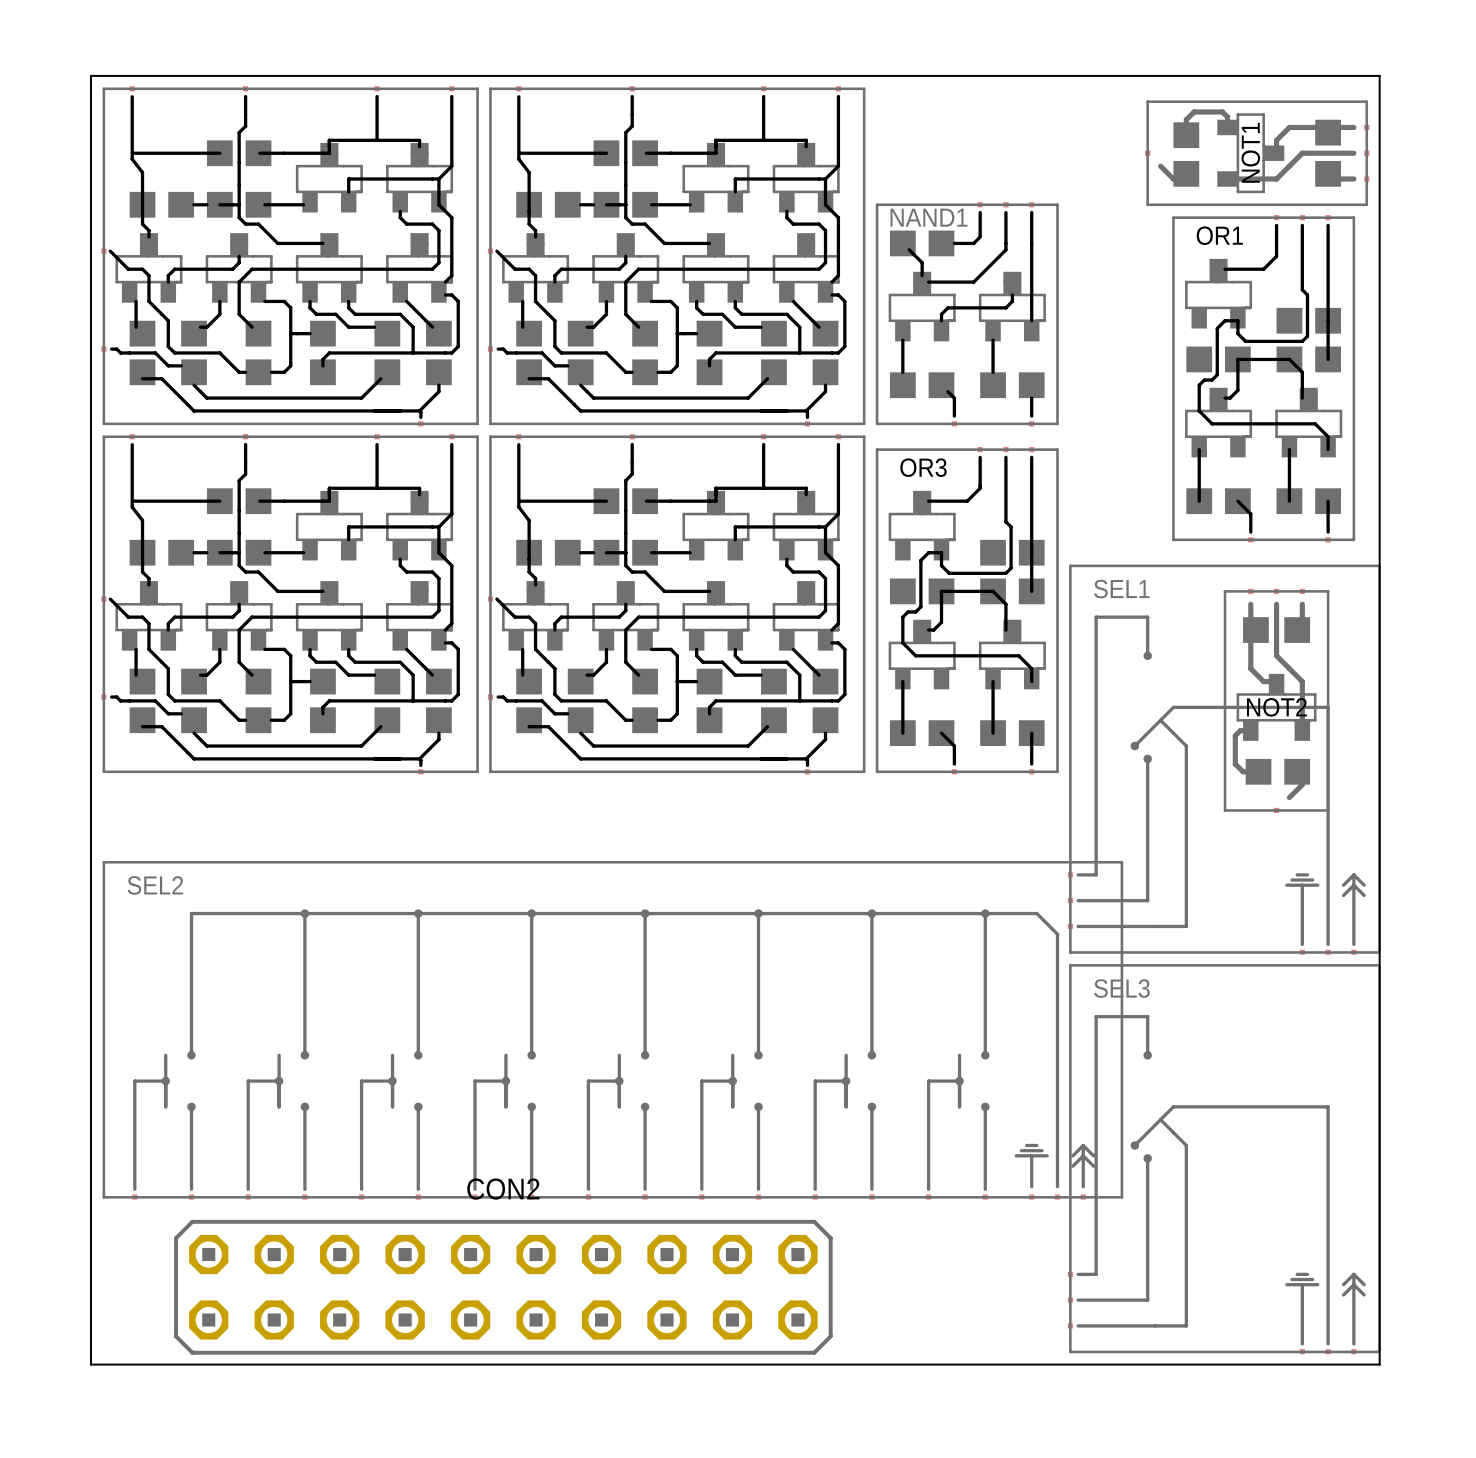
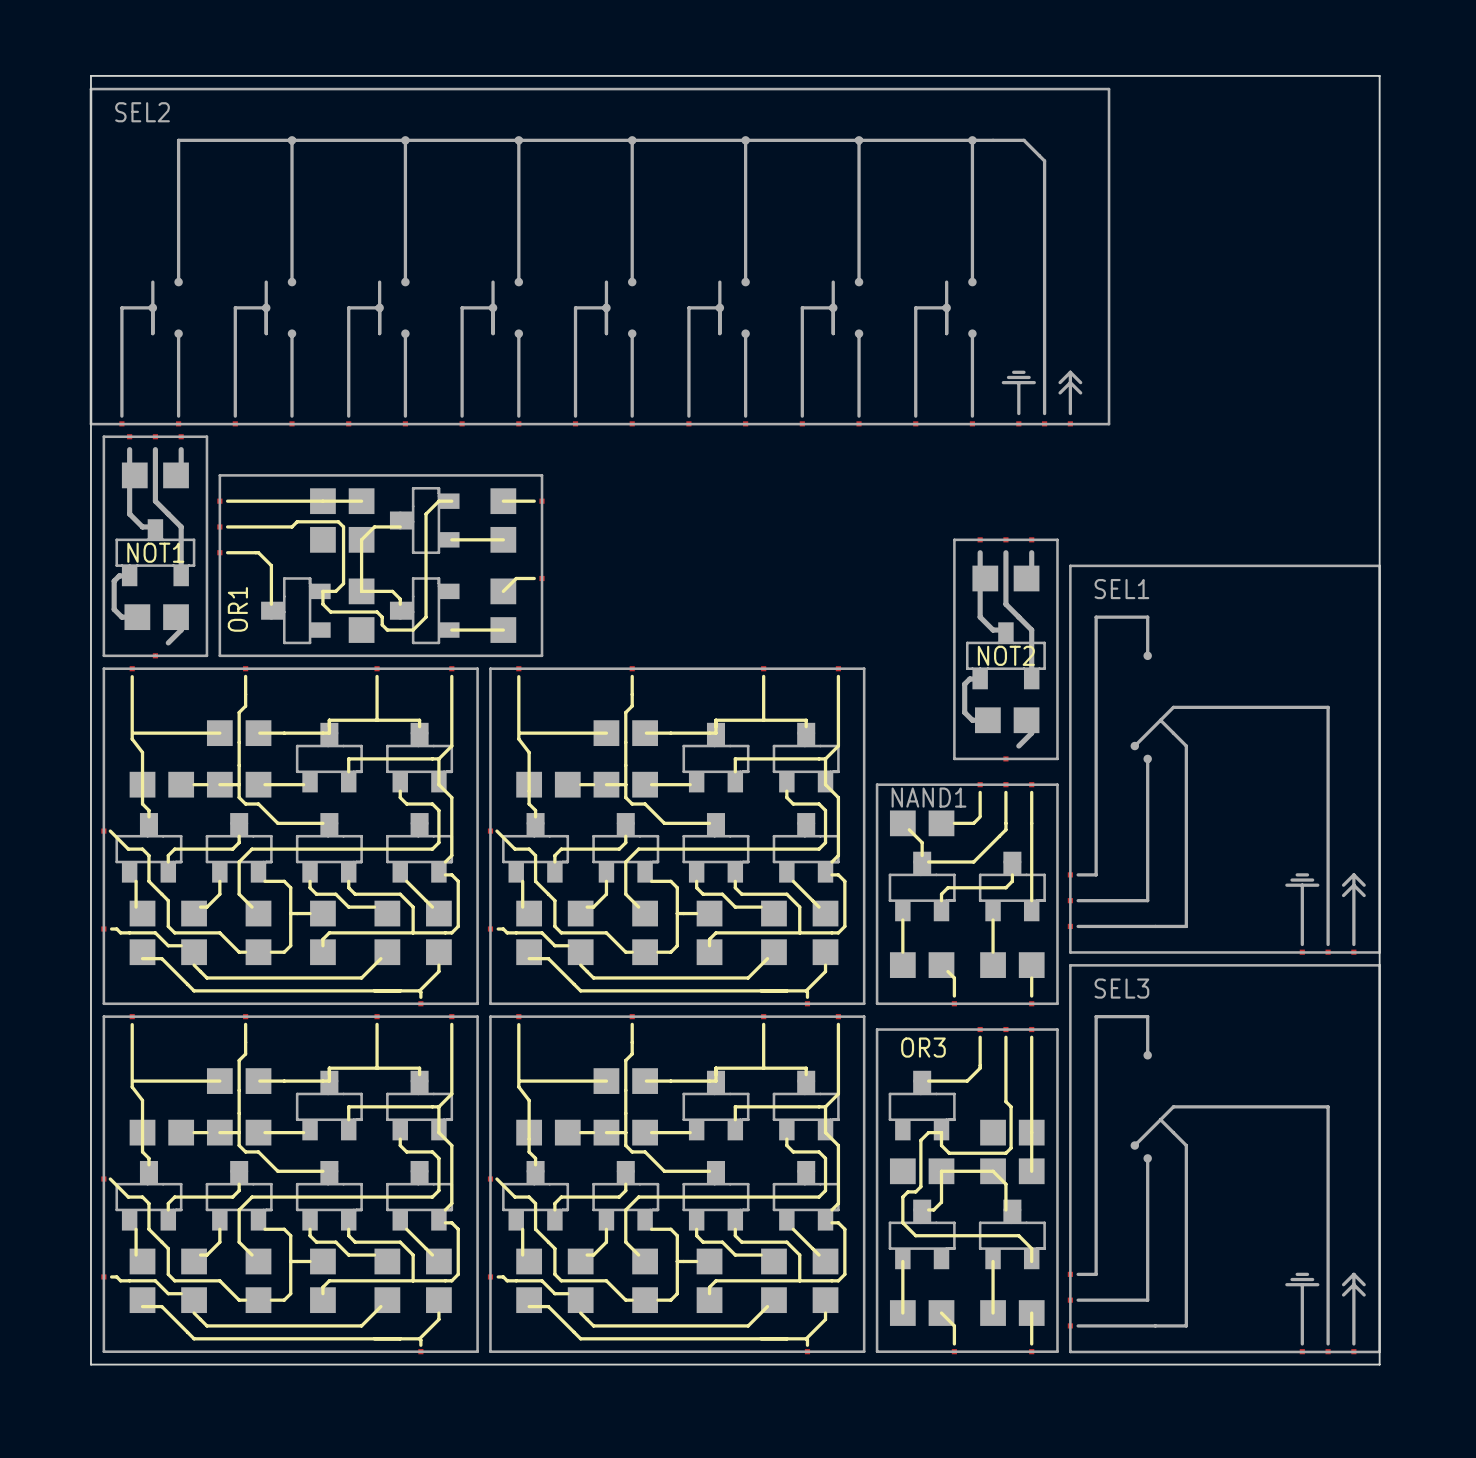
NOT1 rotation: 0° (1257, 153) -> 90° counterclockwise (155, 546)
NOT1 position: (1257, 153) -> (155, 546)
part: (290, 256) -> none
part: (676, 256) -> none
NAND1 position: (967, 314) -> (967, 894)
OR1 rotation: 0° (1263, 378) -> 90° counterclockwise (380, 565)
OR1 position: (1263, 378) -> (380, 565)
part: (290, 604) -> none
part: (676, 604) -> none
OR3 position: (967, 610) -> (967, 1190)
NOT2 position: (1276, 700) -> (1005, 649)
part: none -> (290, 836)
part: none -> (676, 836)
SEL2 position: (612, 1030) -> (600, 257)
part: none -> (290, 1184)
part: none -> (676, 1184)
CON2: (503, 1287) -> none

